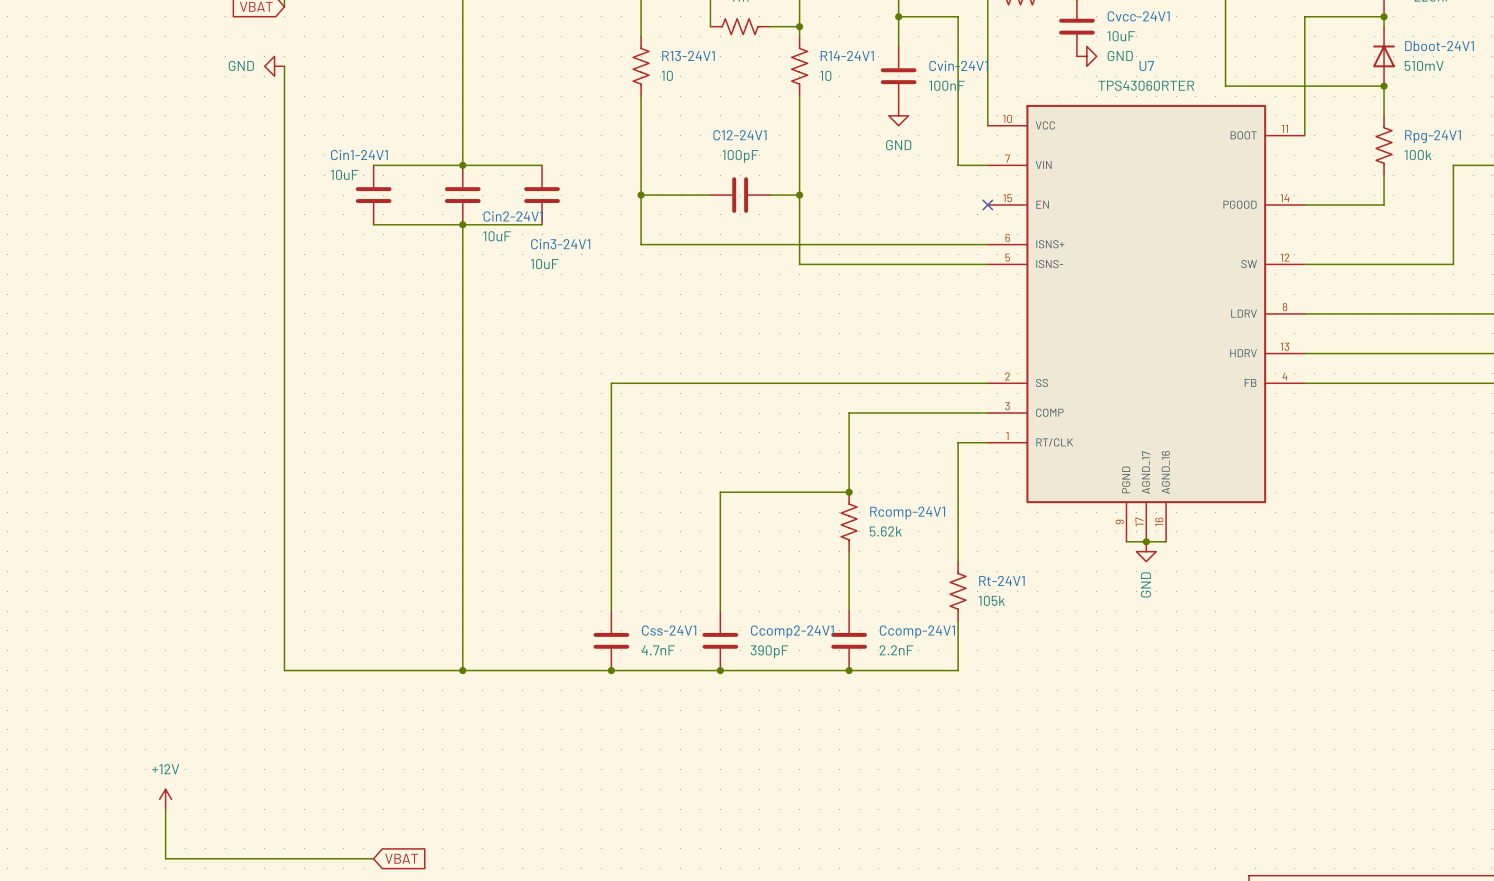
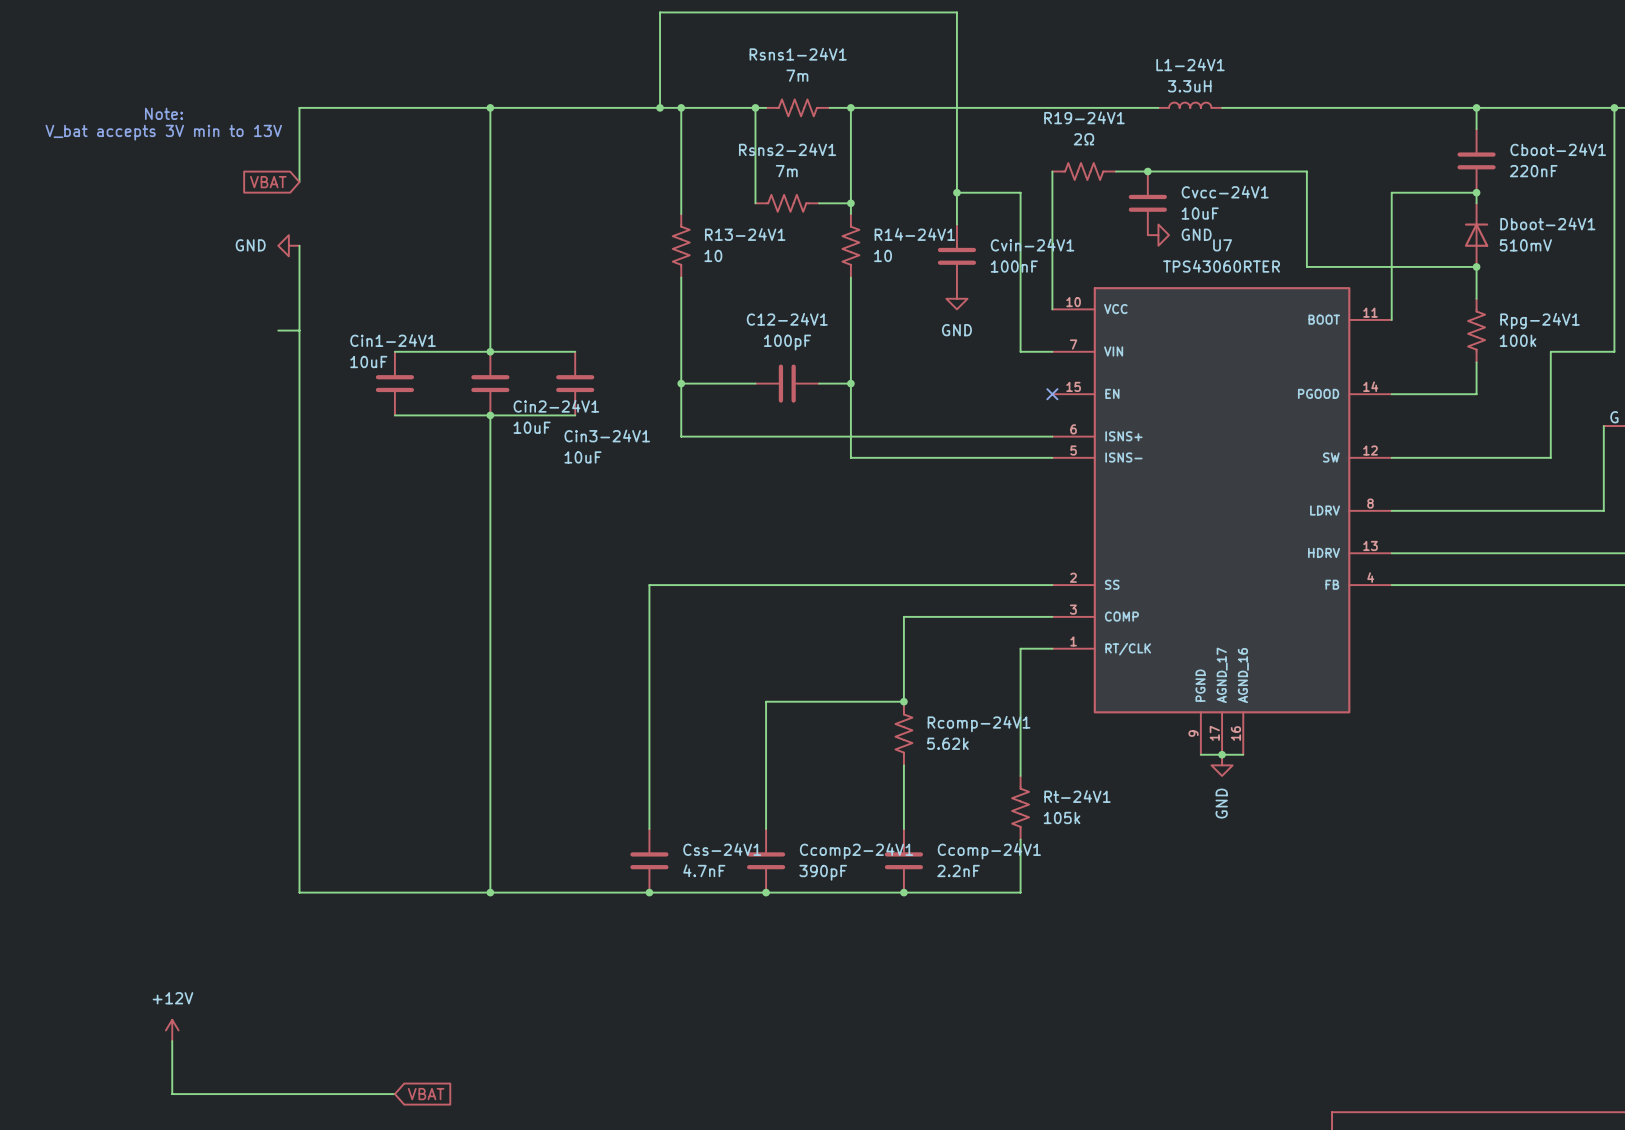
wire: none -> (278, 330) (299, 330)

